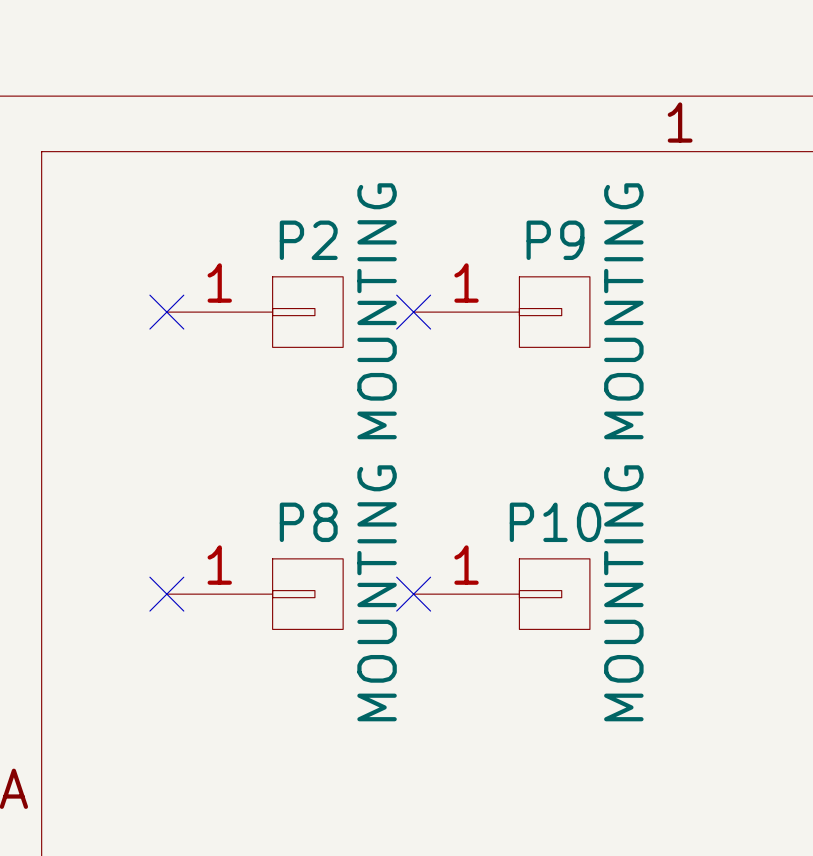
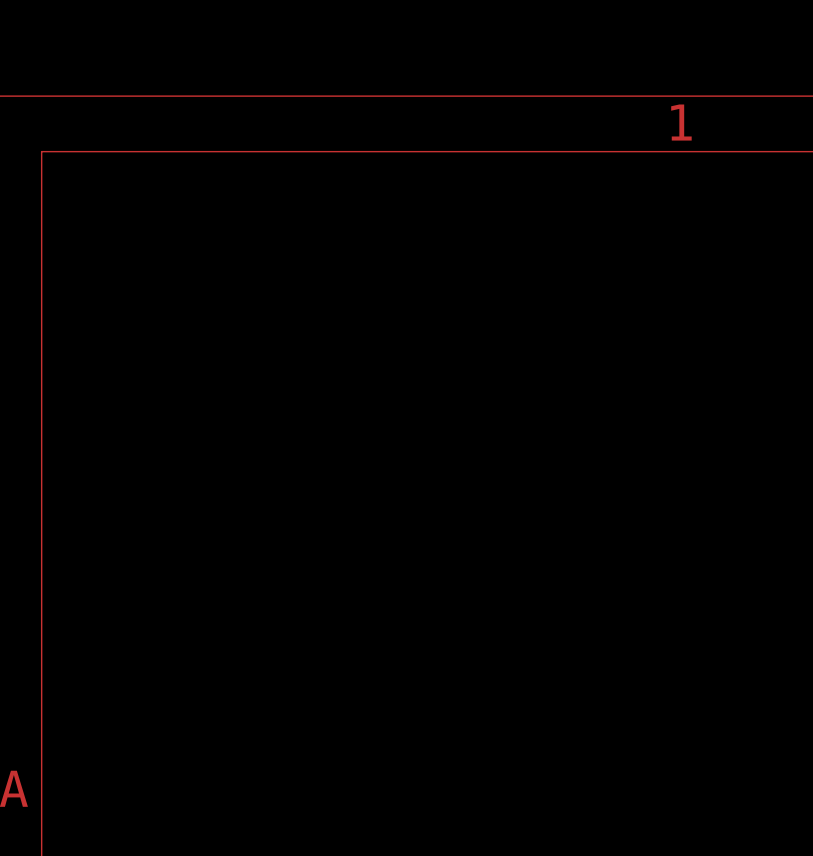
no-connect mark: (166, 312) -> none
P2: MOUNTING (254, 312) -> none
no-connect mark: (413, 312) -> none
P9: MOUNTING (501, 312) -> none
no-connect mark: (166, 594) -> none
P8: MOUNTING (254, 594) -> none
no-connect mark: (413, 594) -> none
P10: MOUNTING (501, 594) -> none

